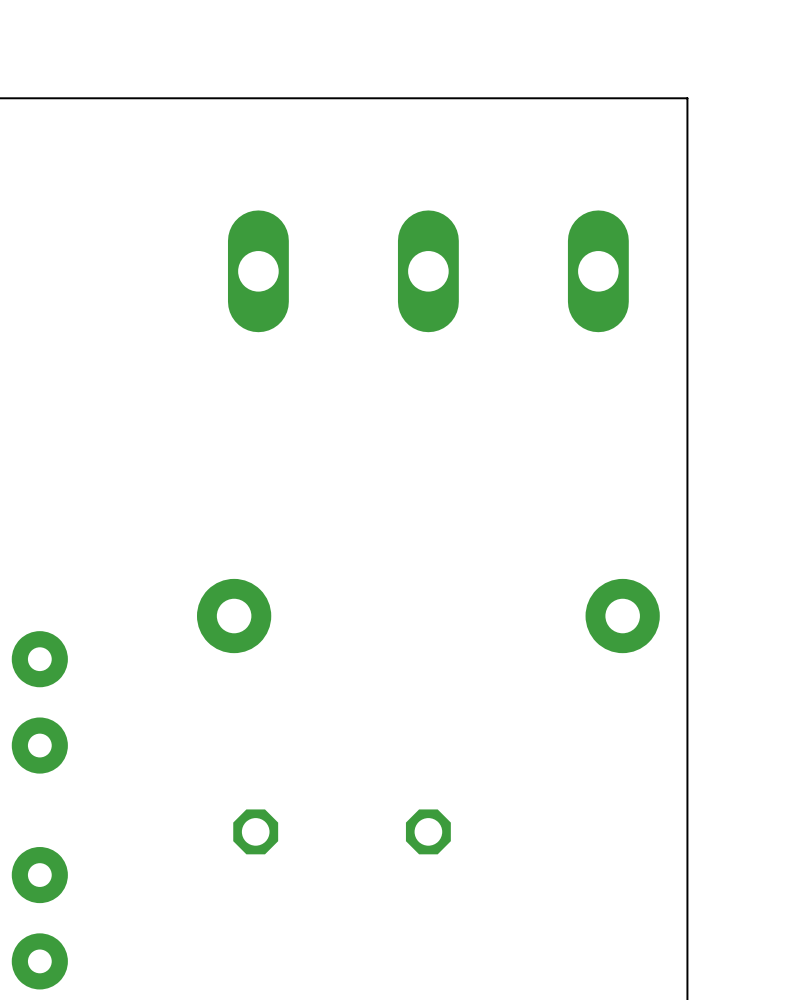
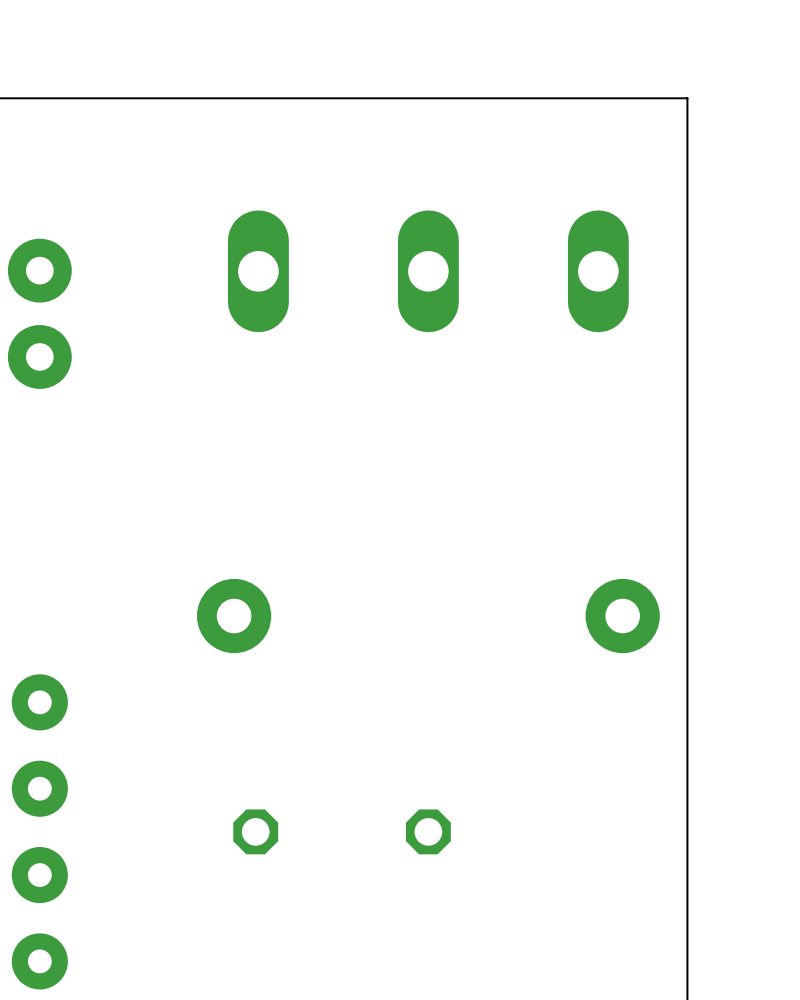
part: none -> (39, 313)
part position: (39, 702) -> (39, 745)

